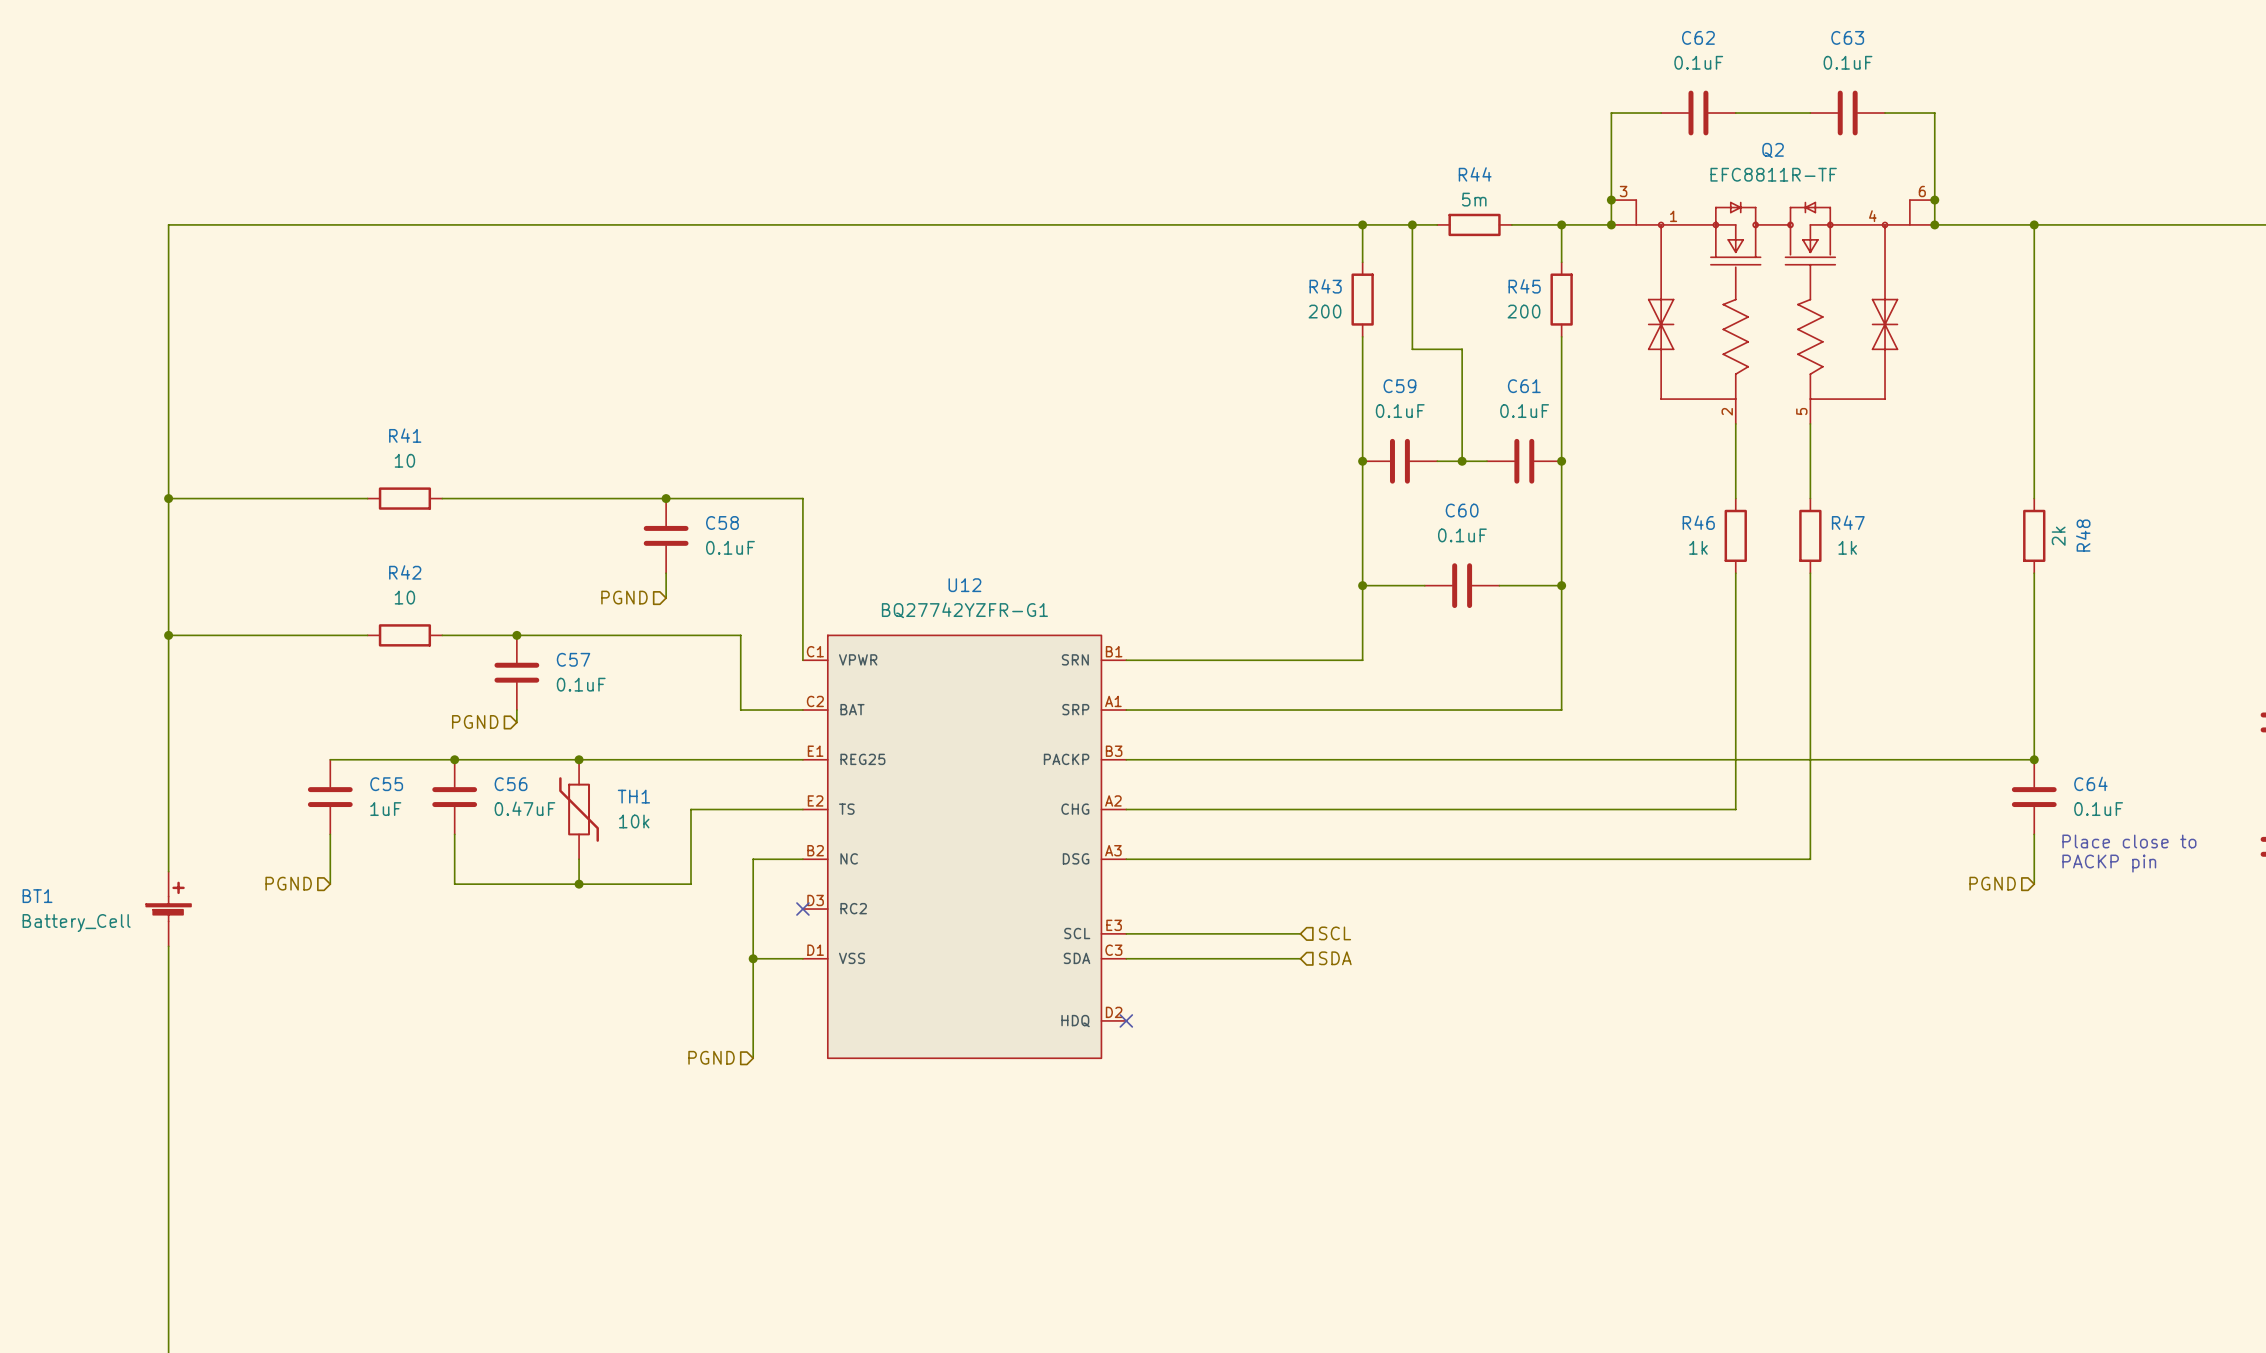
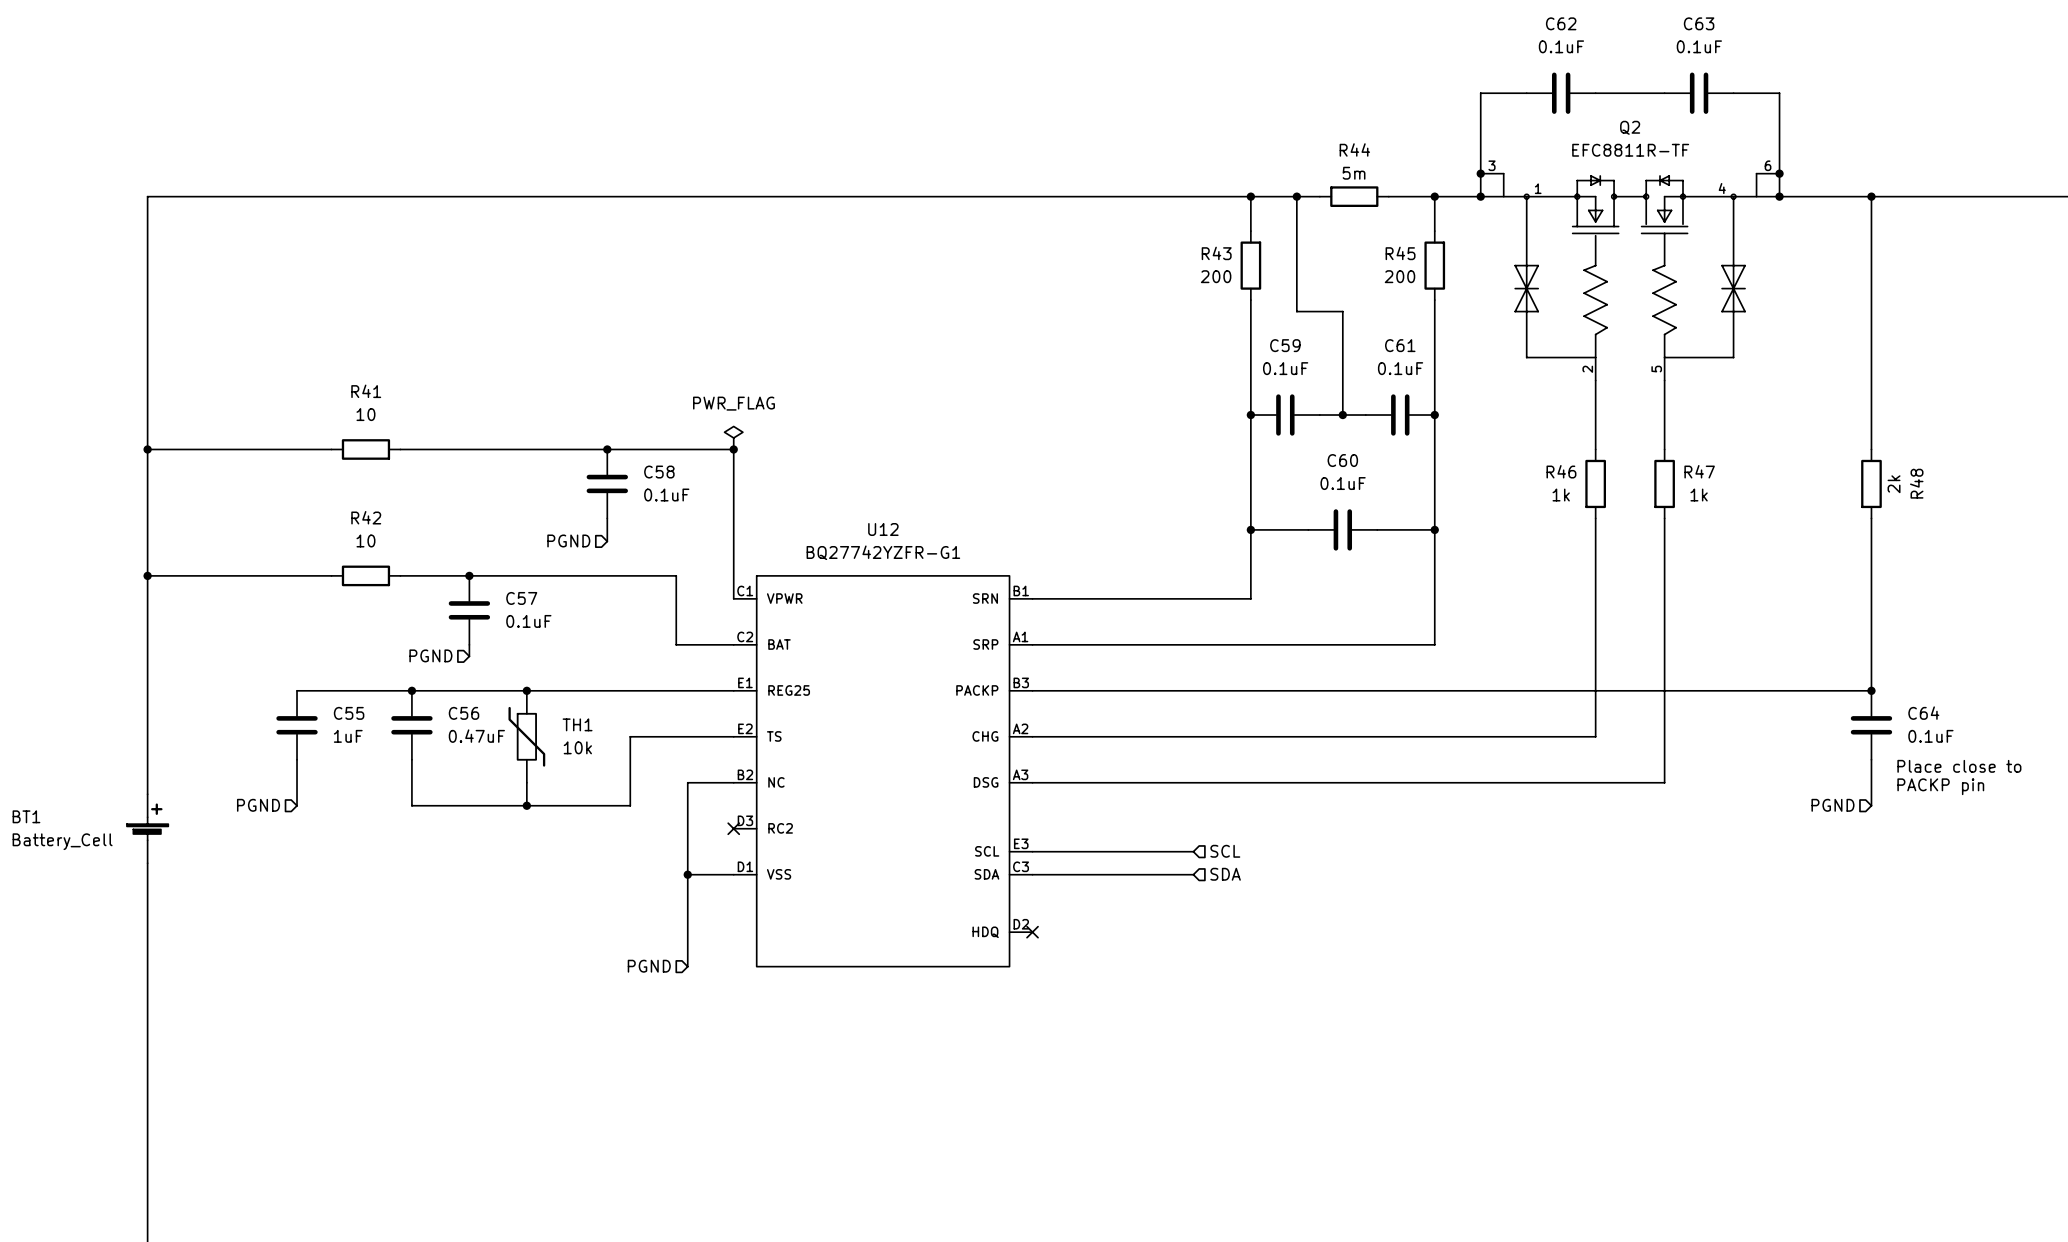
power symbol: none -> PWR_FLAG (733, 437)
junction: none -> (733, 449)

